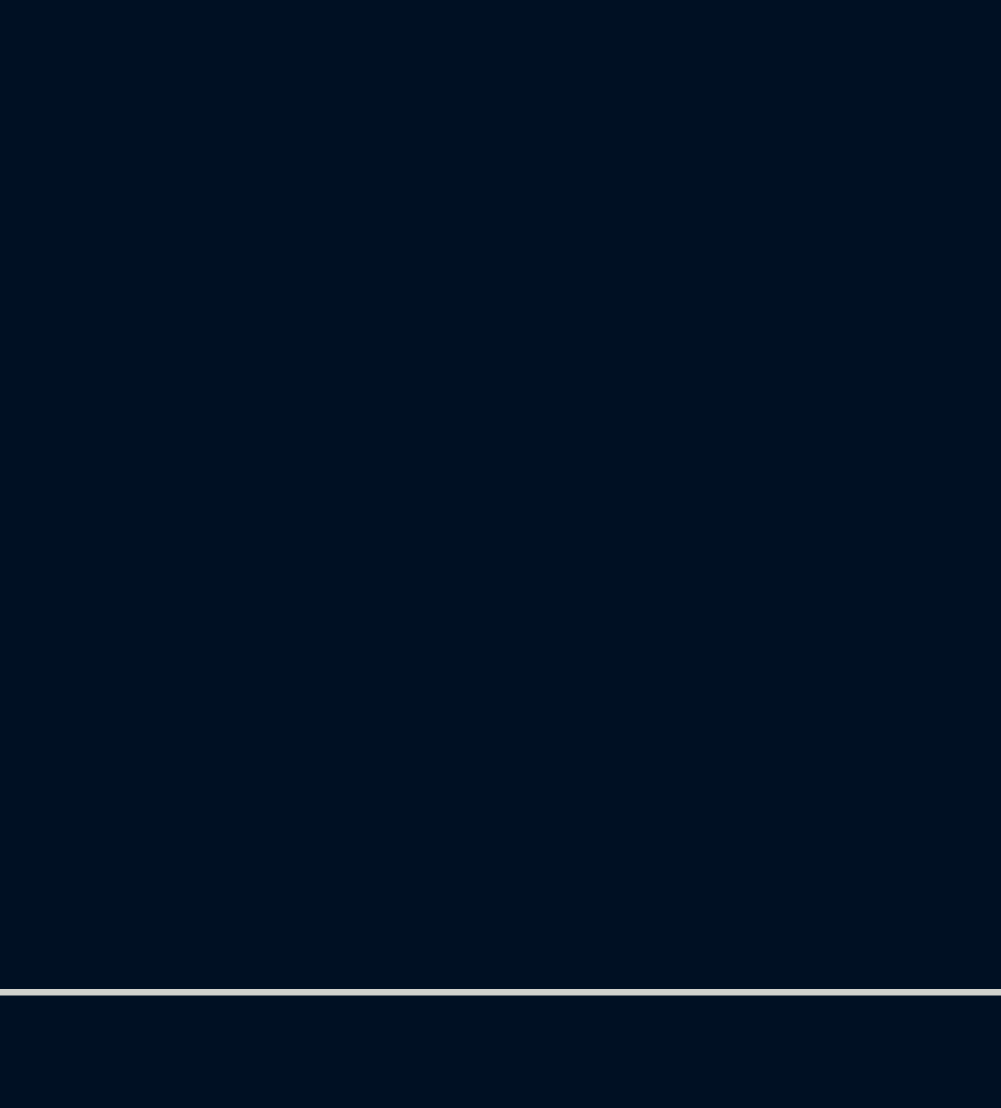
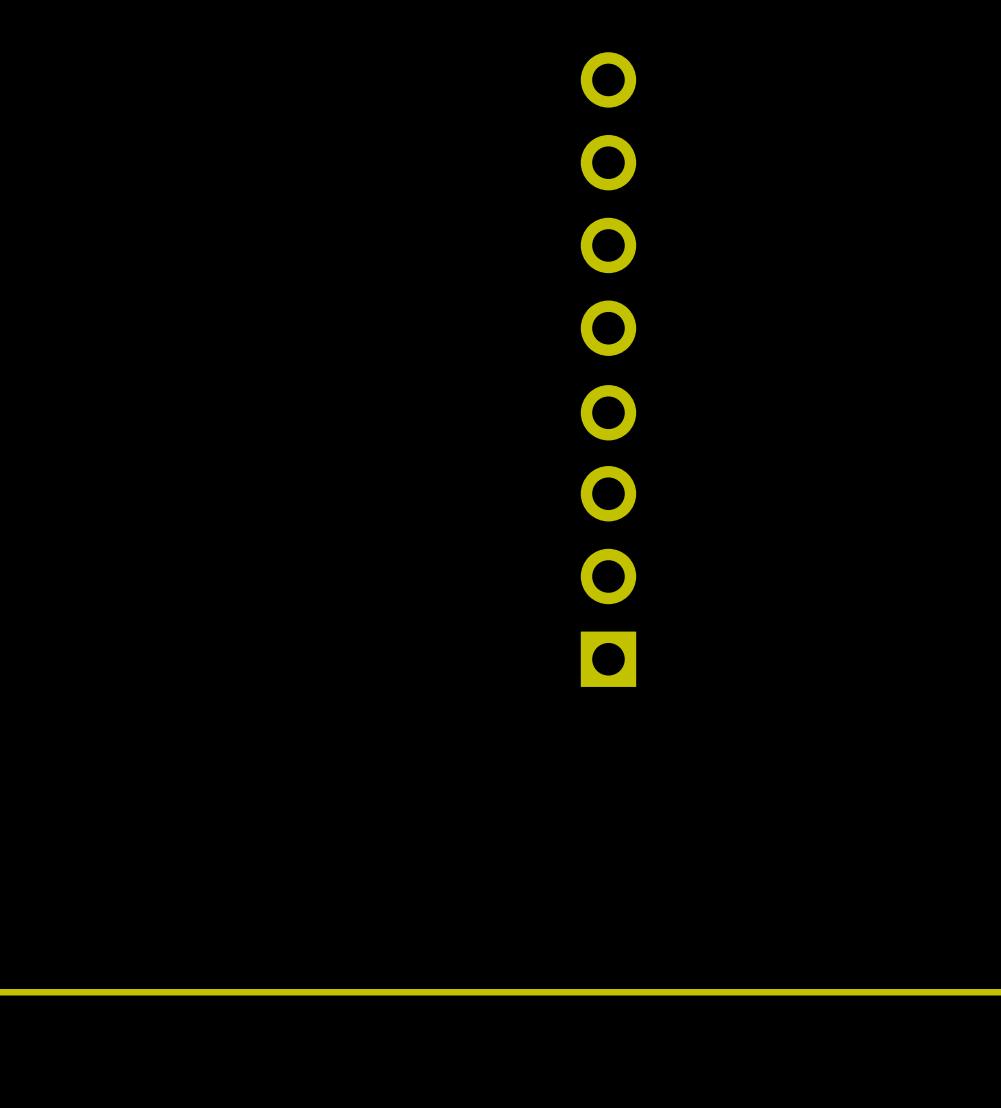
part: none -> (608, 369)

